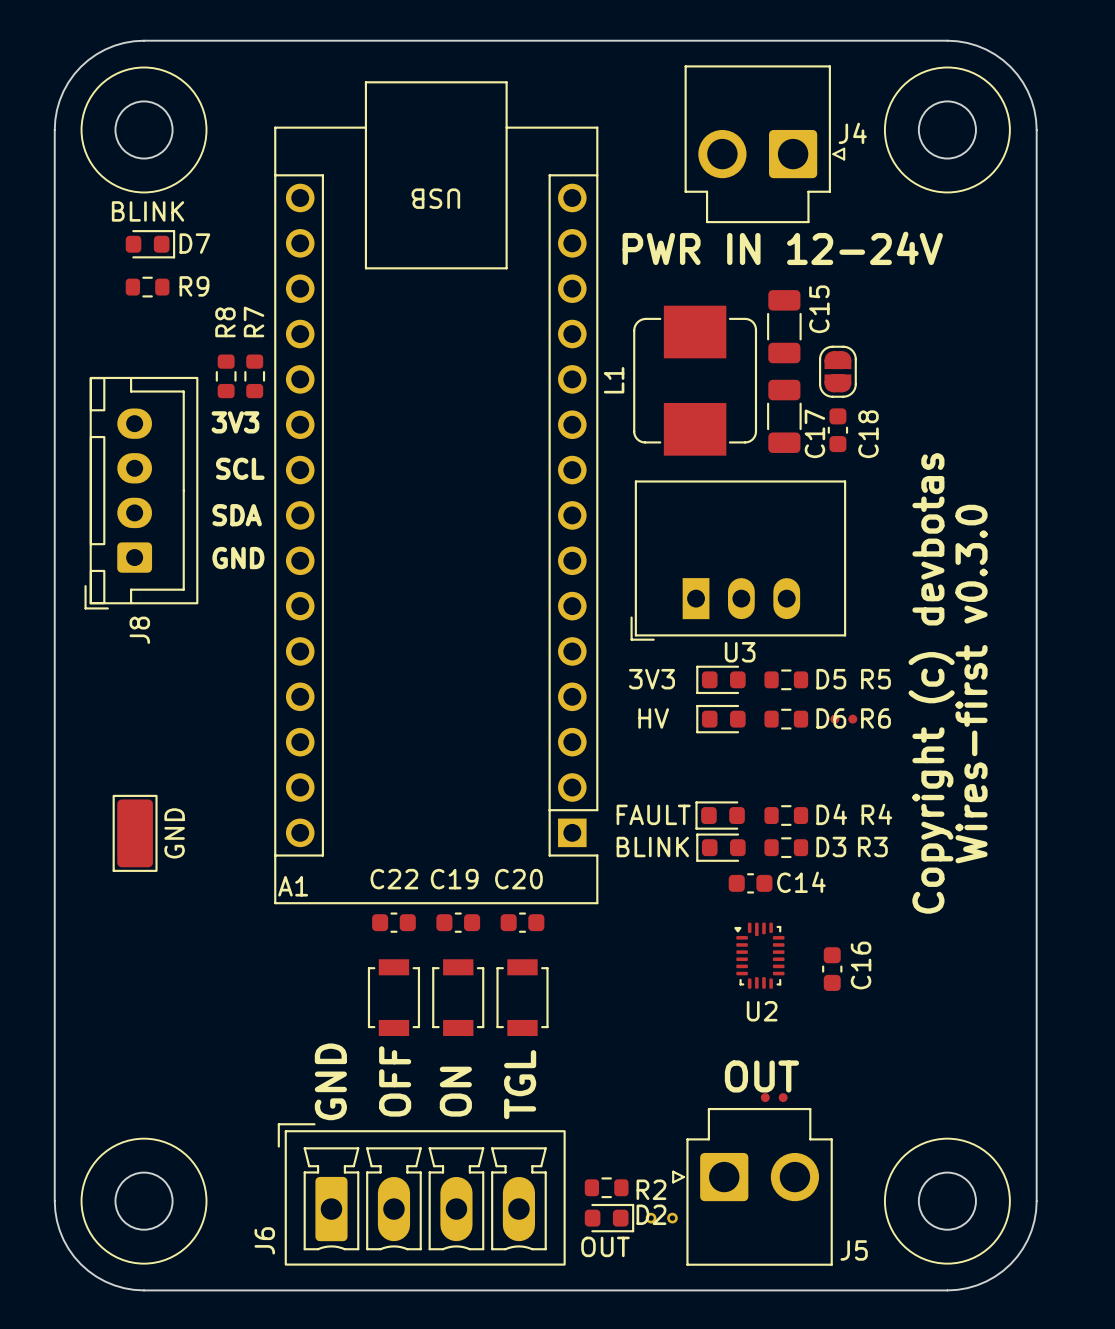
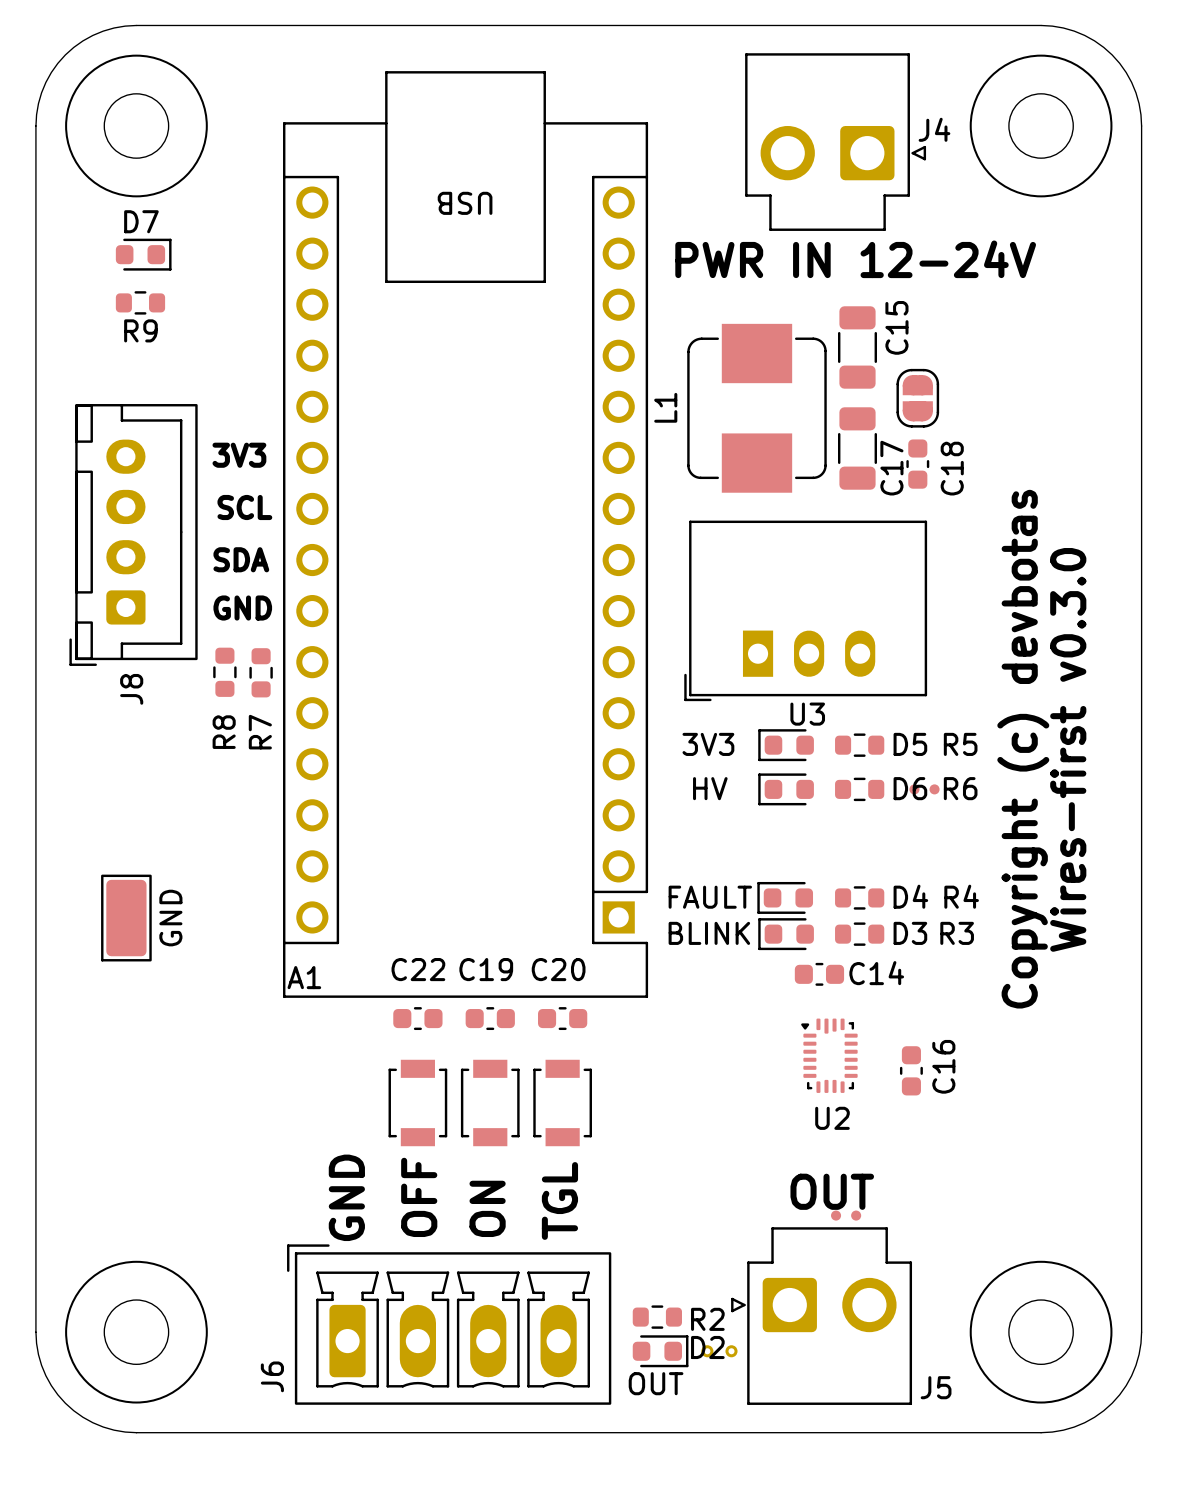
D7 value: BLINK (148, 211) -> none
D7 name position: D7 (194, 243) -> D7 (141, 221)
R9 name position: R9 (194, 286) -> R9 (140, 330)
R7 name position: R7 (254, 321) -> R7 (260, 732)
R8 name position: R8 (225, 322) -> R8 (224, 732)
R8 position: (226, 376) -> (224, 672)
R7 position: (254, 376) -> (261, 672)

